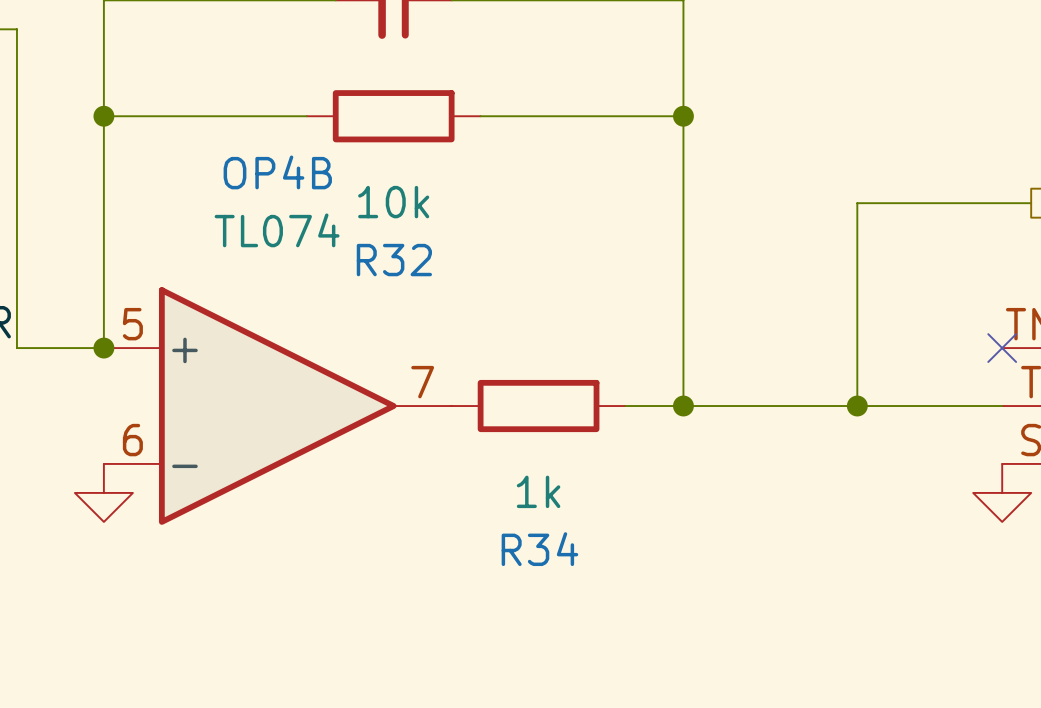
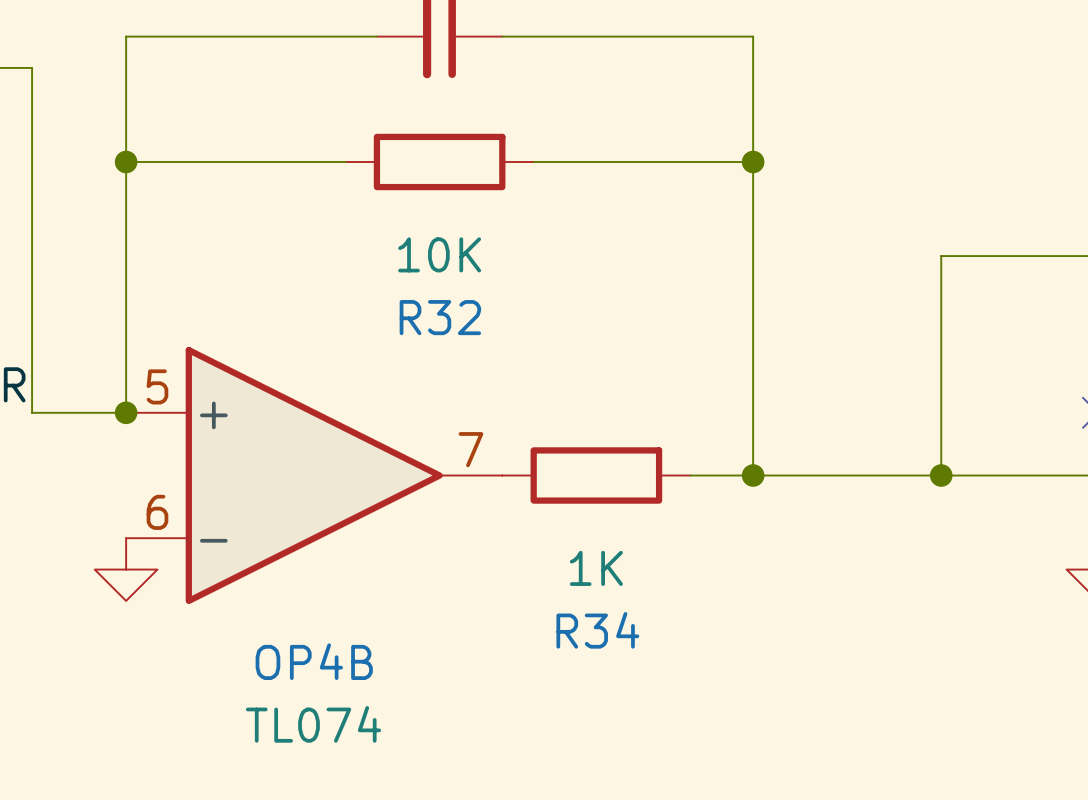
OP4B name position: OP4B (277, 172) -> OP4B (314, 661)
R32 text: 10k (393, 202) -> 10K (439, 254)
OP4B value position: TL074 (277, 230) -> TL074 (313, 724)
R34 text: 1k (538, 491) -> 1K (596, 568)

